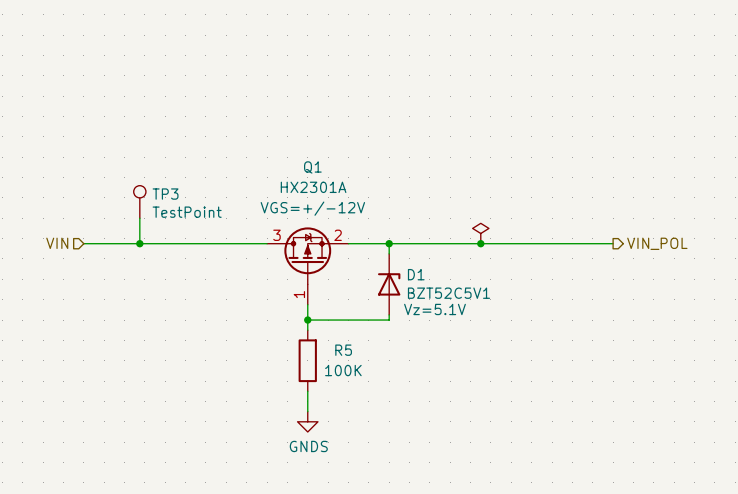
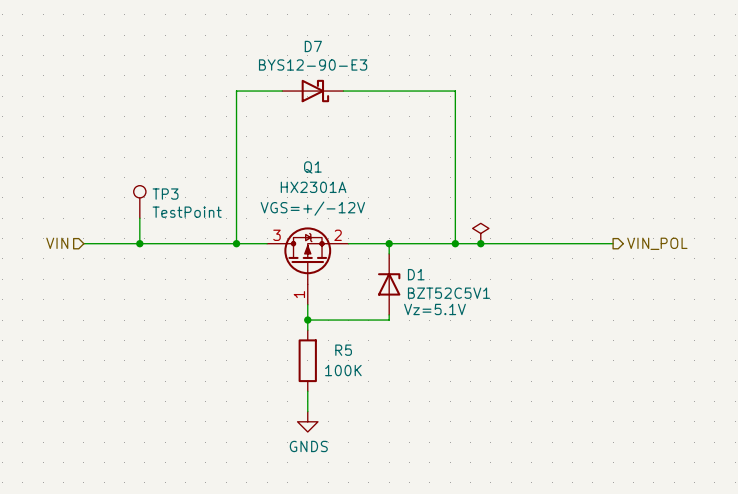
wire: none -> (282, 91) (236, 91) (236, 243)
D7: none -> BYS12-90-E3 (312, 91)
wire: none -> (343, 91) (455, 91) (455, 243)
junction: none -> (236, 243)
junction: none -> (455, 243)

